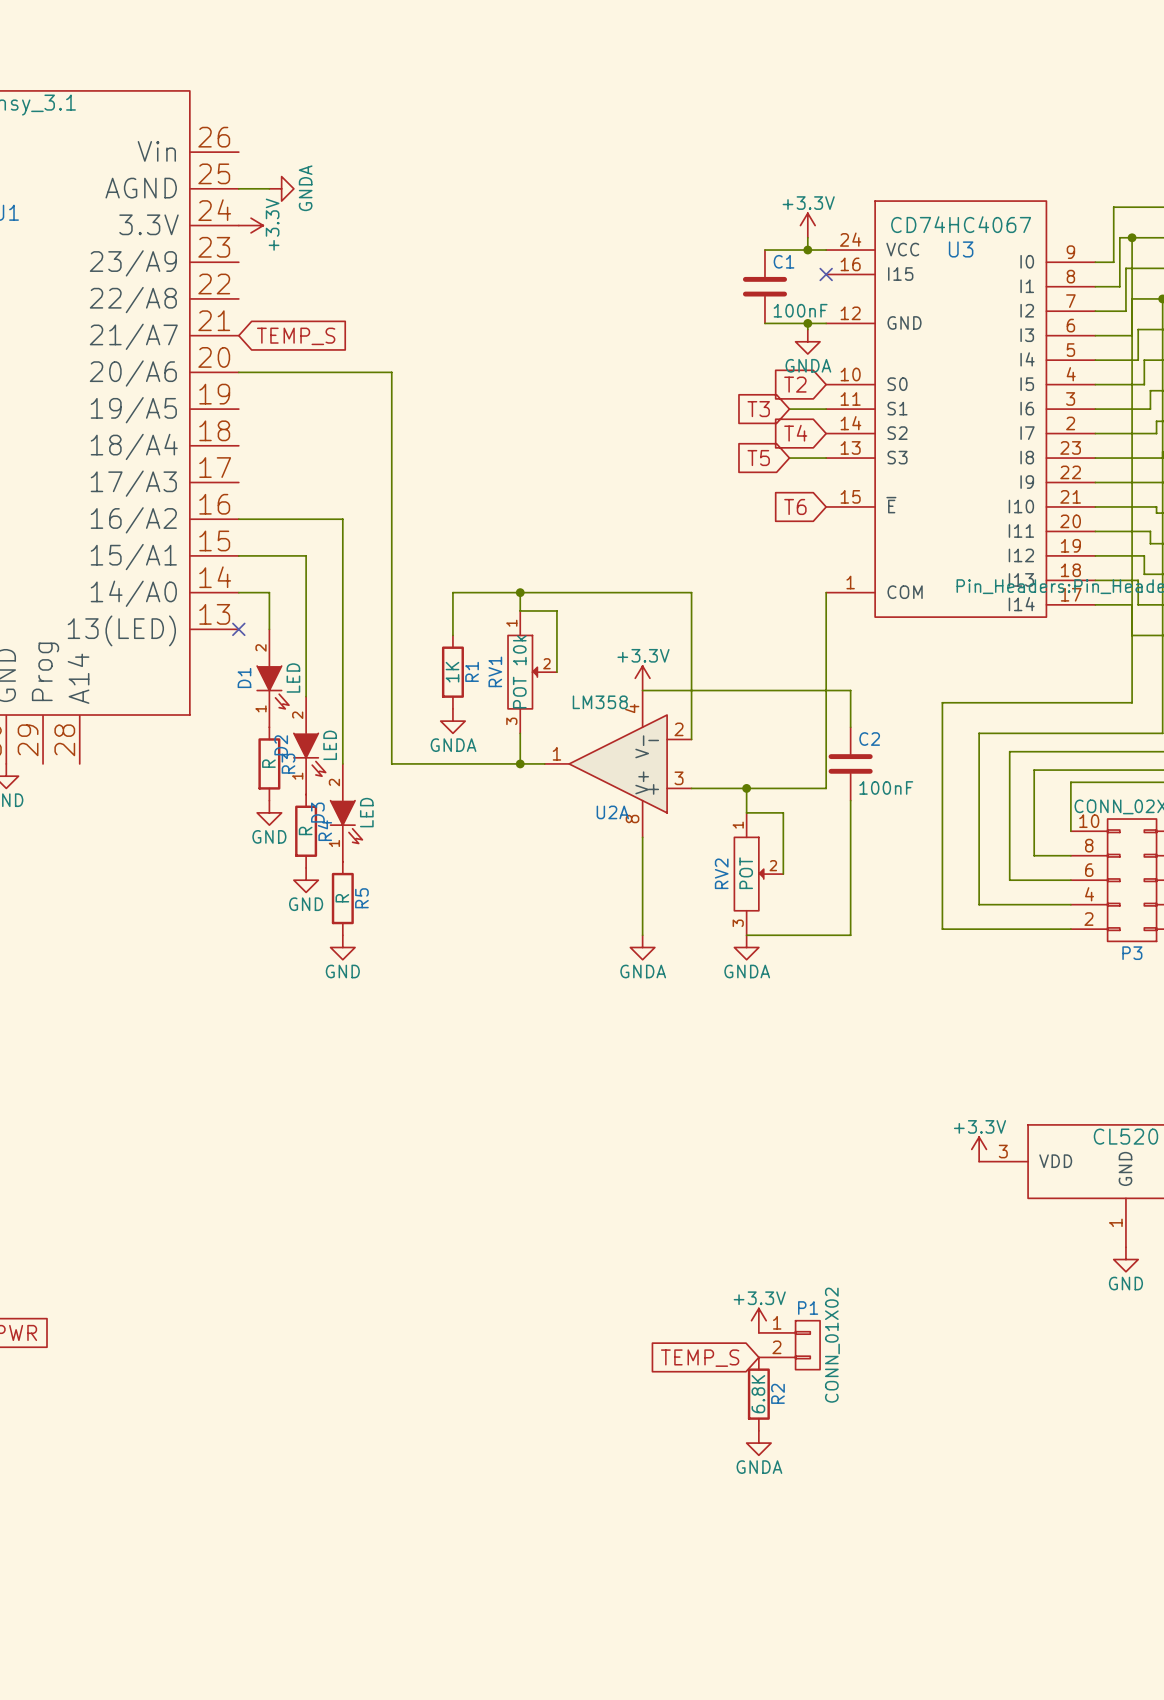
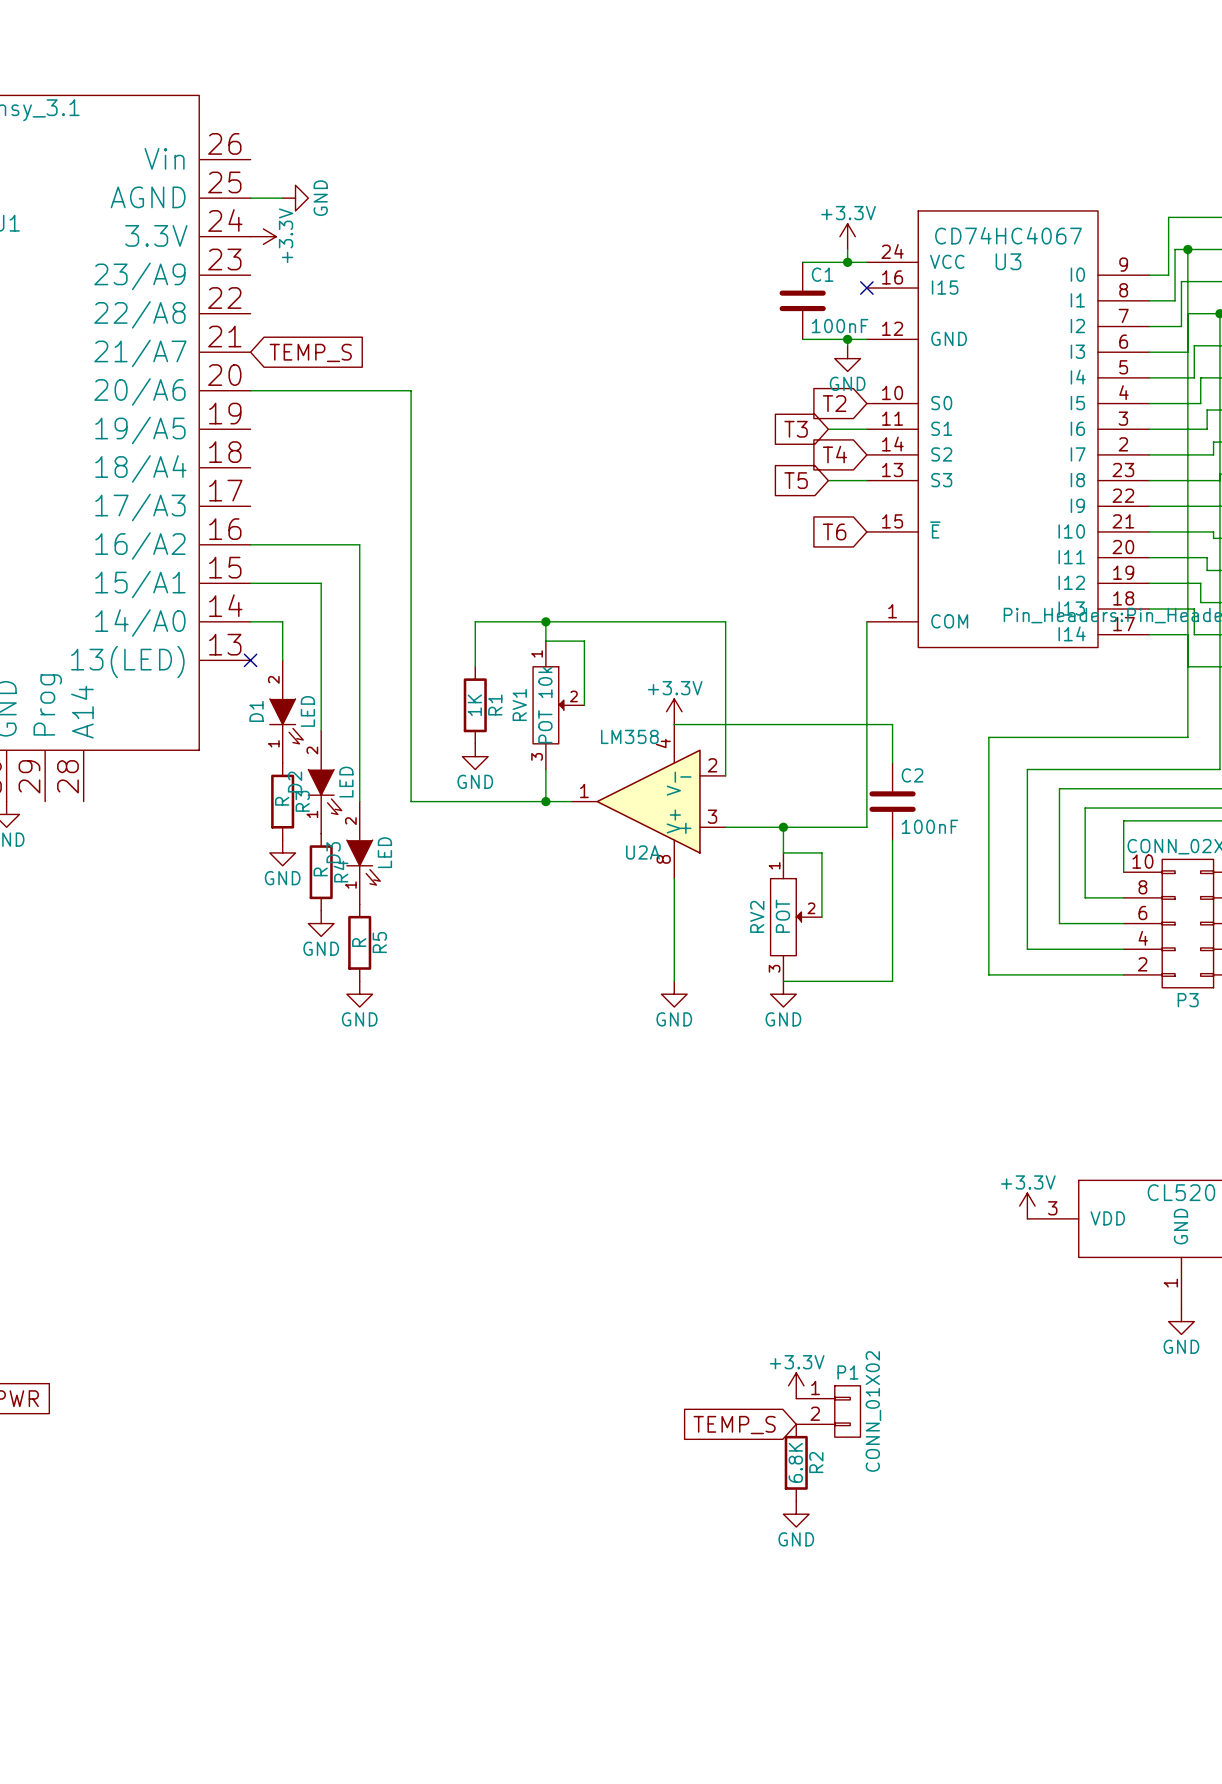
power symbol: GNDA (281, 188) -> GND (295, 198)
power symbol: GNDA (807, 341) -> GND (847, 358)
power symbol: GNDA (452, 721) -> GND (475, 756)
power symbol: GNDA (642, 947) -> GND (674, 994)
power symbol: GNDA (746, 947) -> GND (783, 994)
power symbol: GNDA (758, 1443) -> GND (796, 1514)

